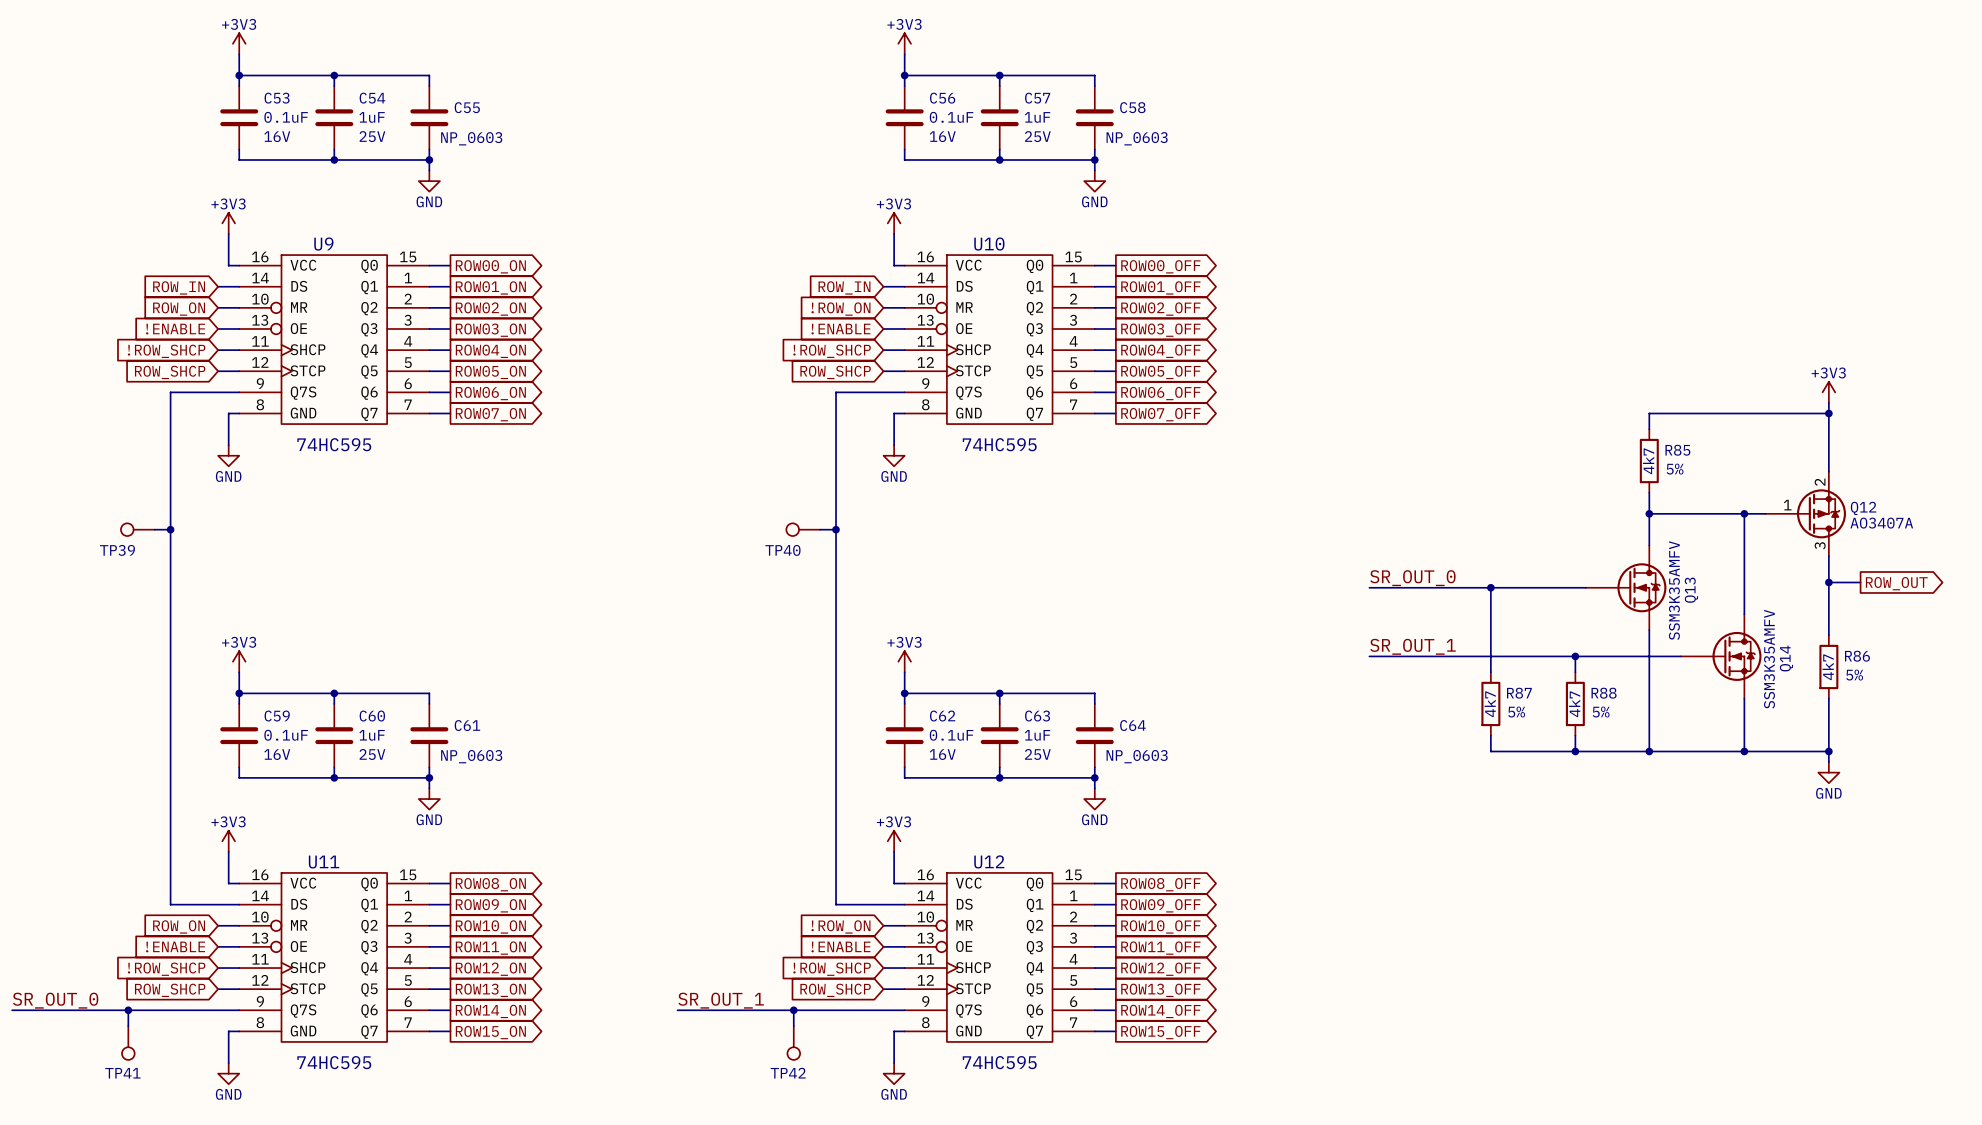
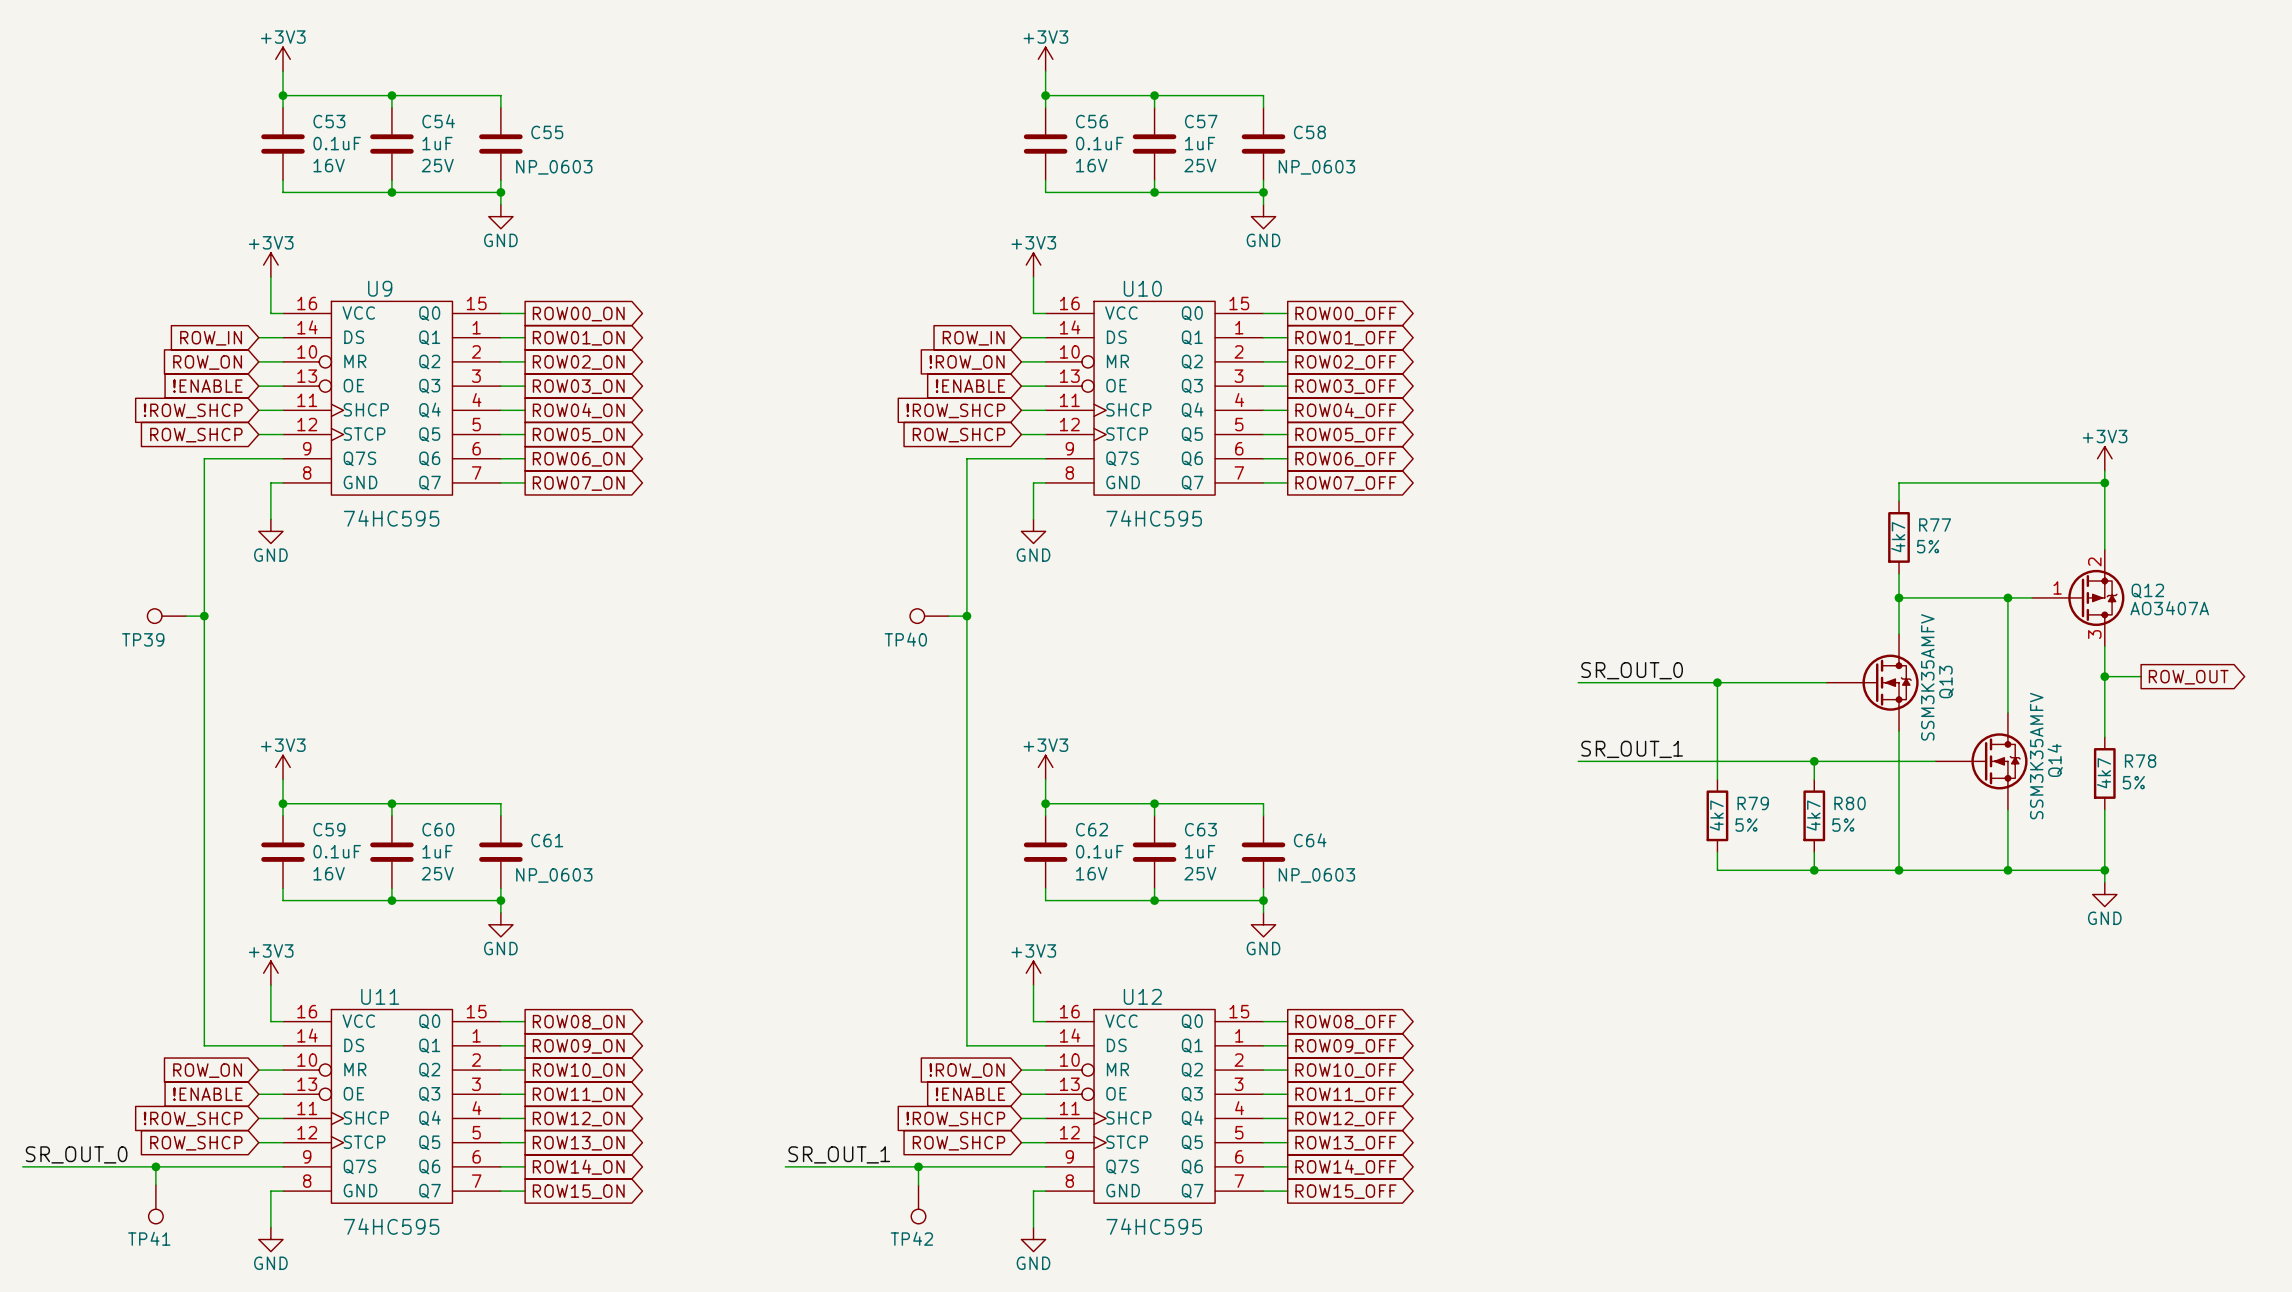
R85 name: R85 (1677, 450) -> R77 (1935, 525)
R86 name: R86 (1857, 656) -> R78 (2140, 761)
R87 name: R87 (1519, 693) -> R79 (1753, 803)
R88 name: R88 (1604, 693) -> R80 (1850, 803)

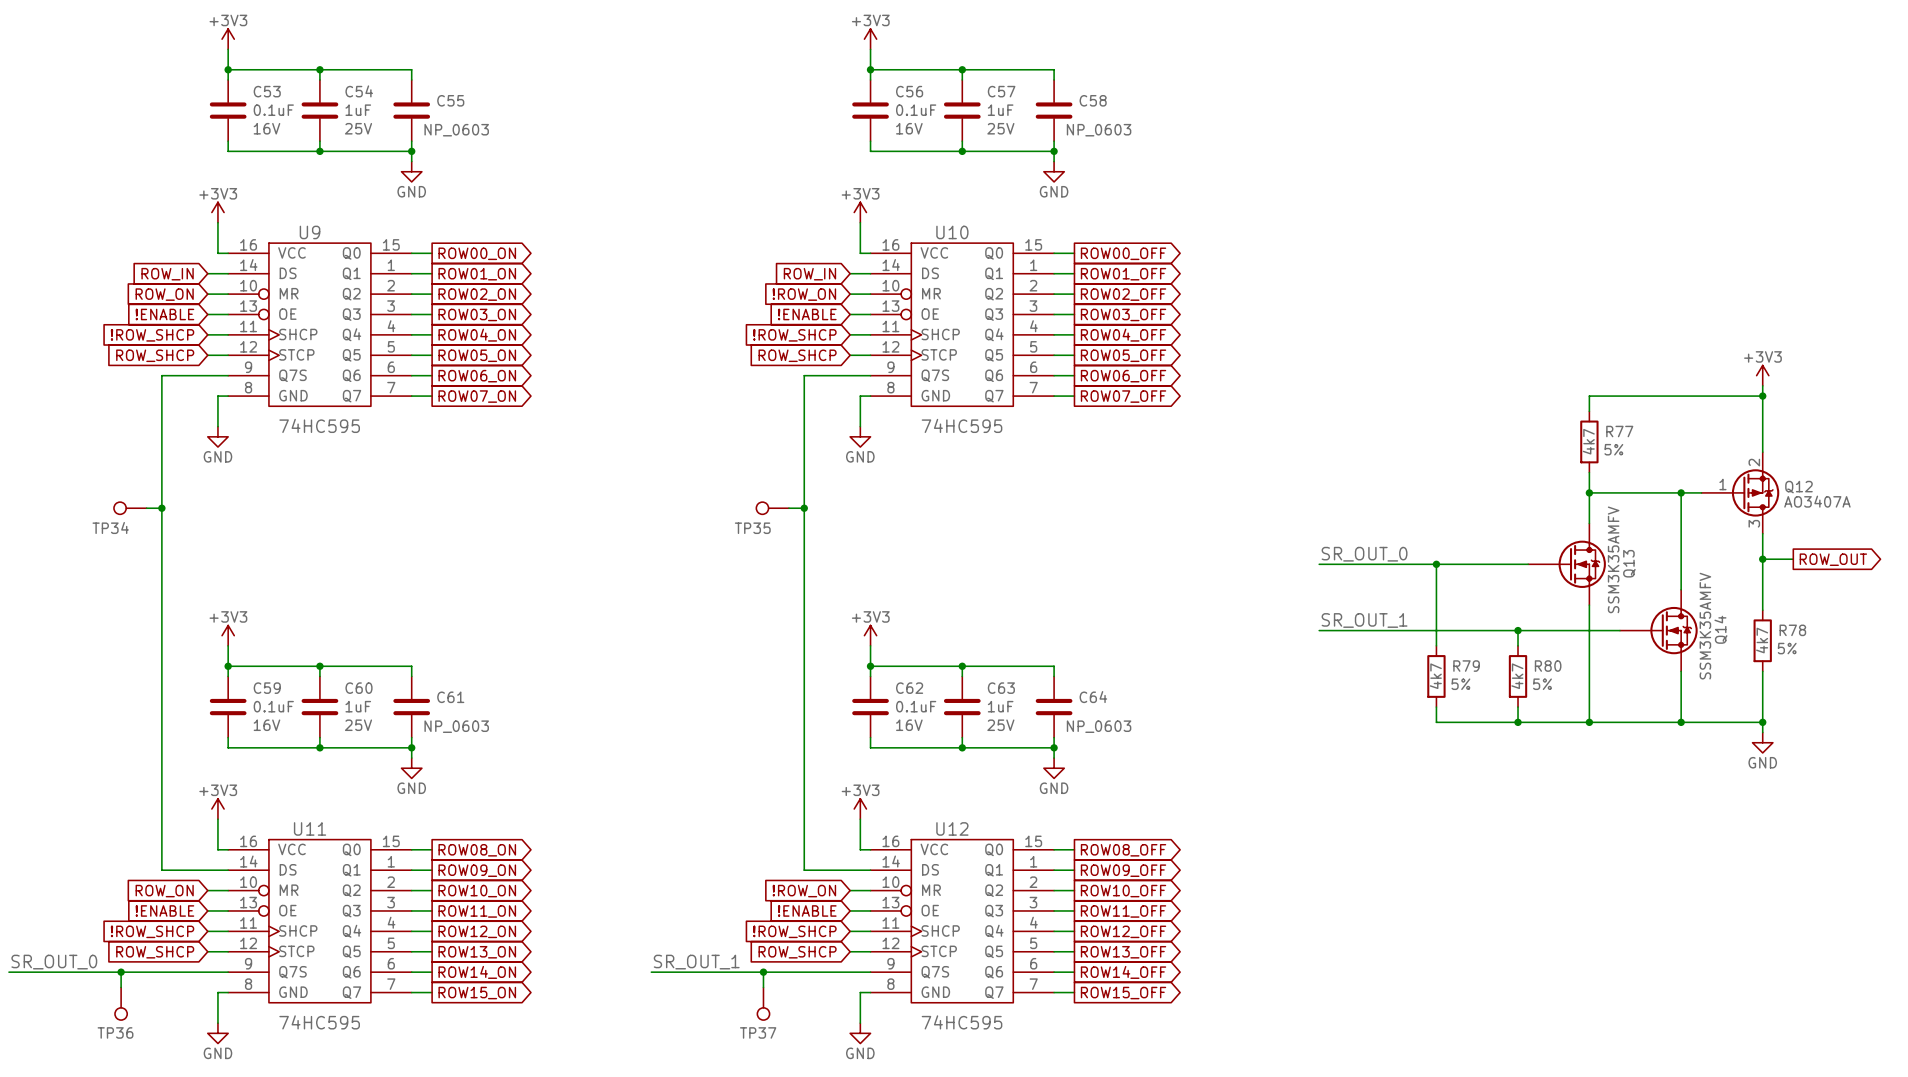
TP39 name: TP39 (143, 639) -> TP34 (110, 527)
TP40 name: TP40 (905, 639) -> TP35 (752, 528)
TP41 name: TP41 (149, 1238) -> TP36 (115, 1032)
TP42 name: TP42 (911, 1238) -> TP37 (758, 1032)

